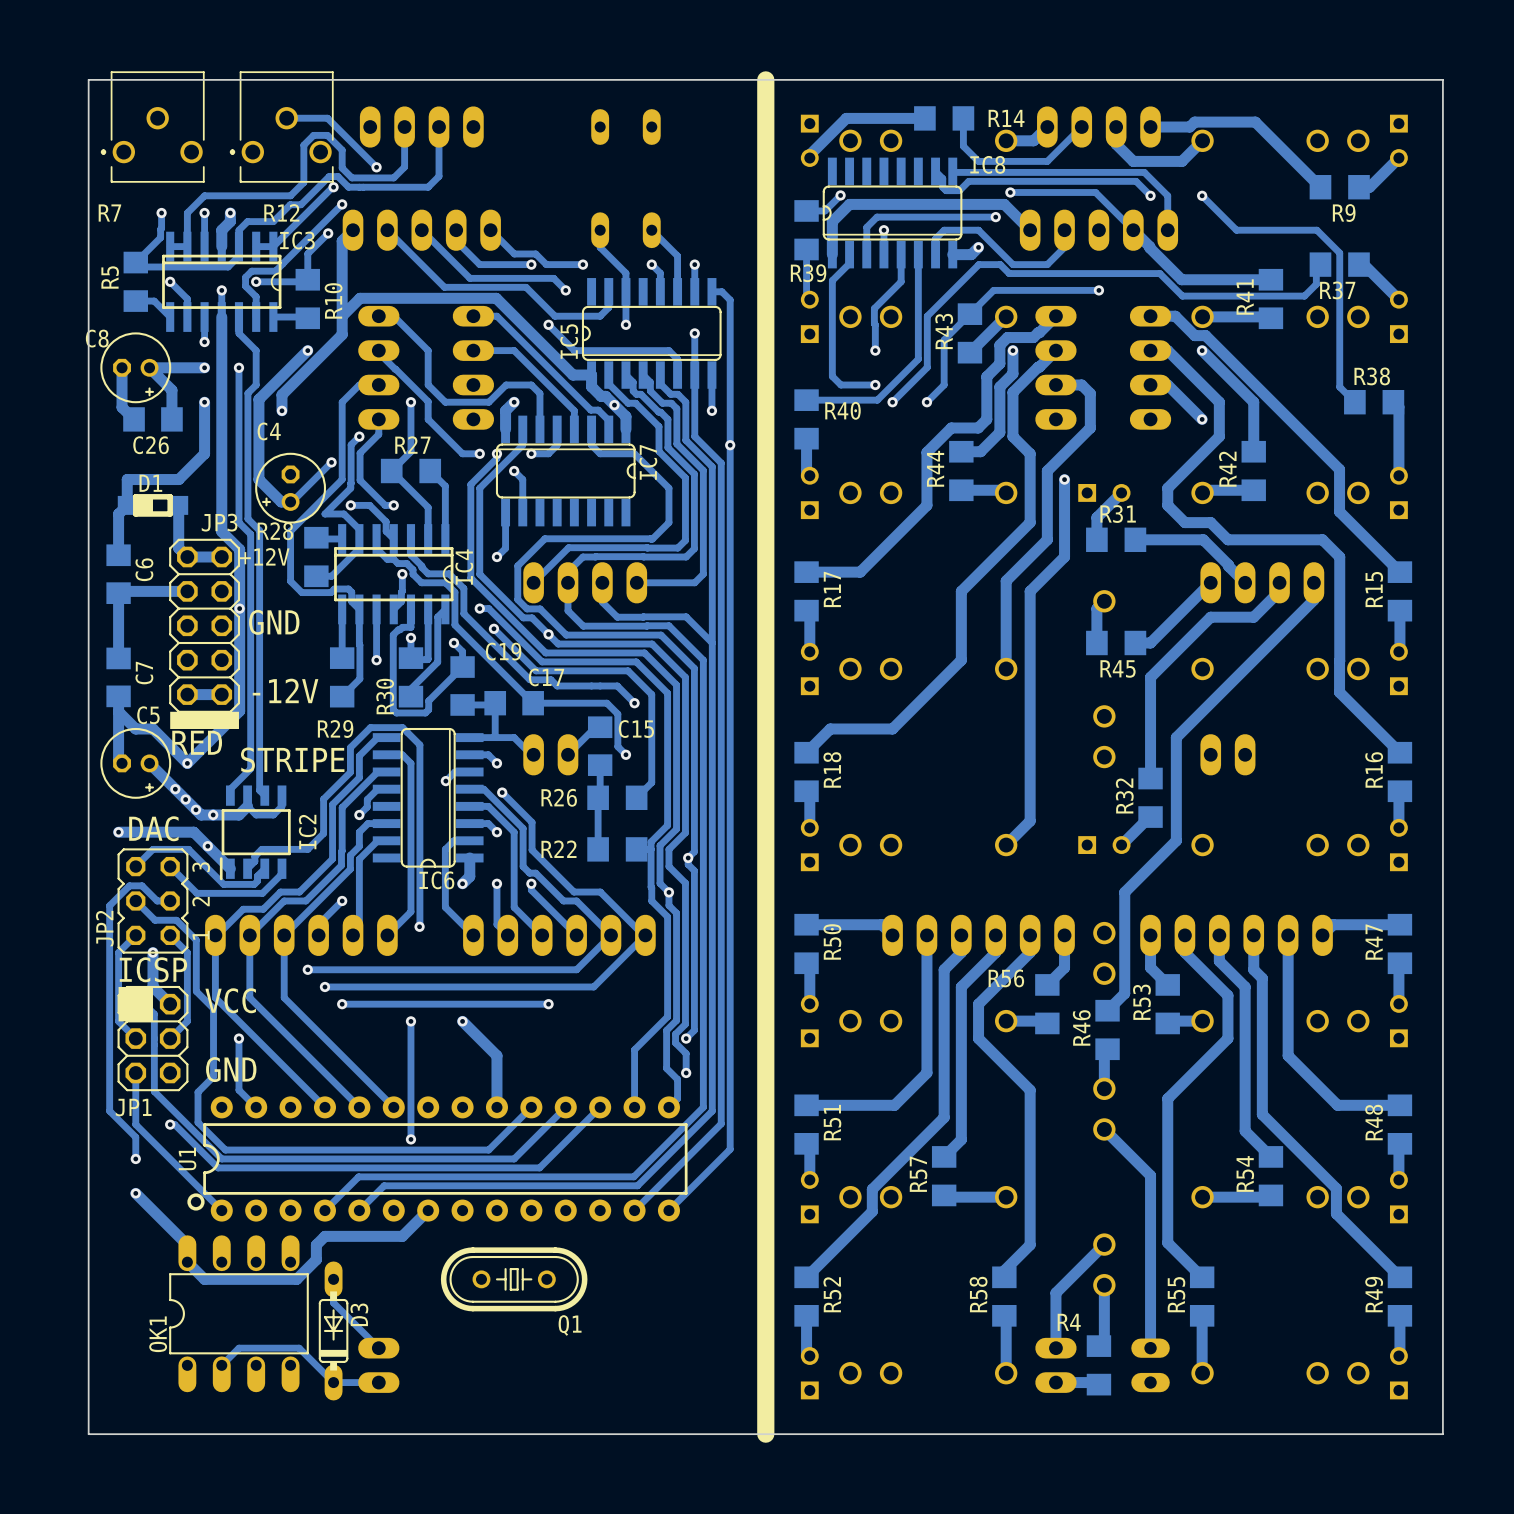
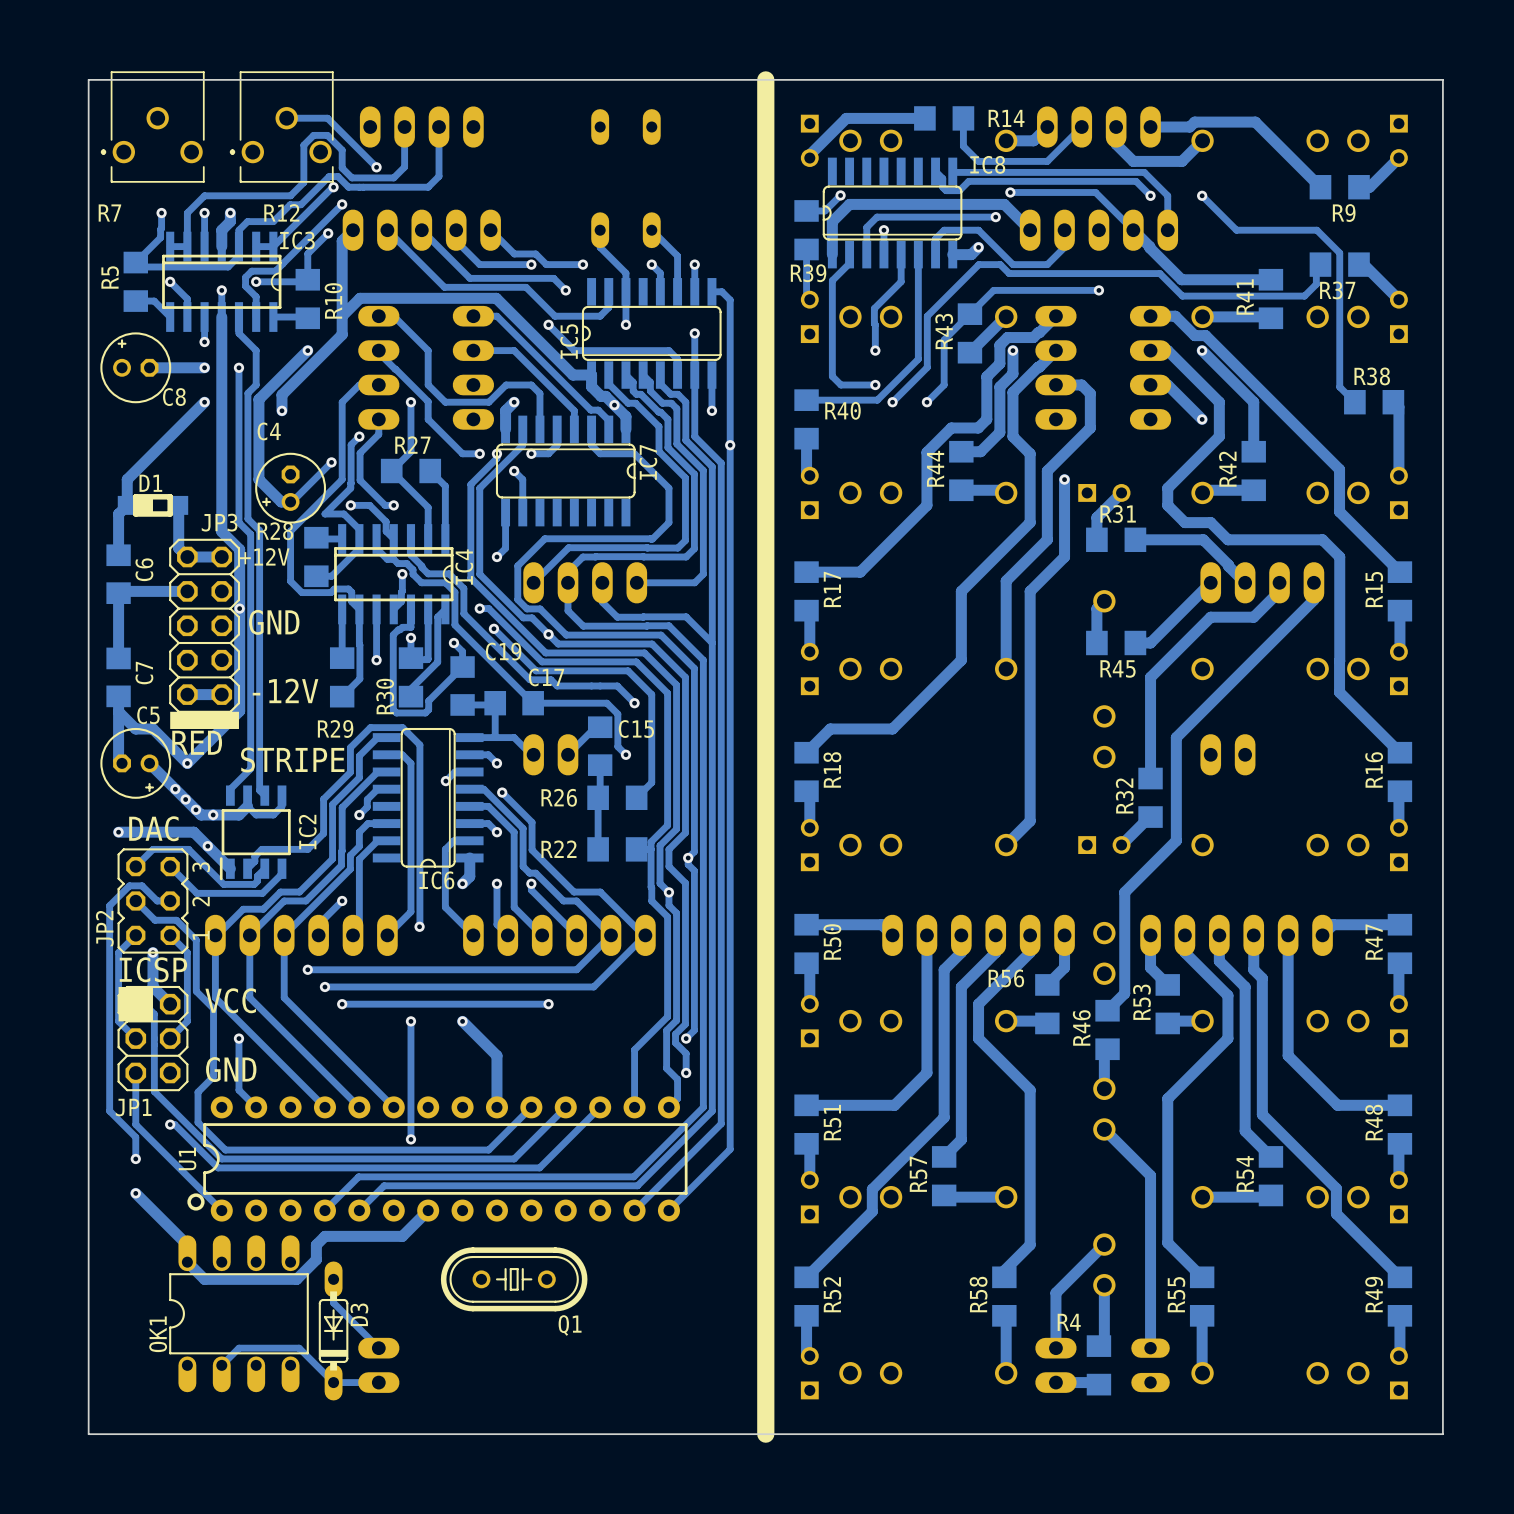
track: (122, 367) (122, 407) (134, 419) -> none
C8 rotation: 0° (135, 367) -> 180° (135, 367)
track: (149, 367) (171, 390) (171, 419) -> none
track: (204, 402) (204, 453) (178, 479) (127, 479) -> (204, 402) (127, 479)
C26: (152, 419) -> none

